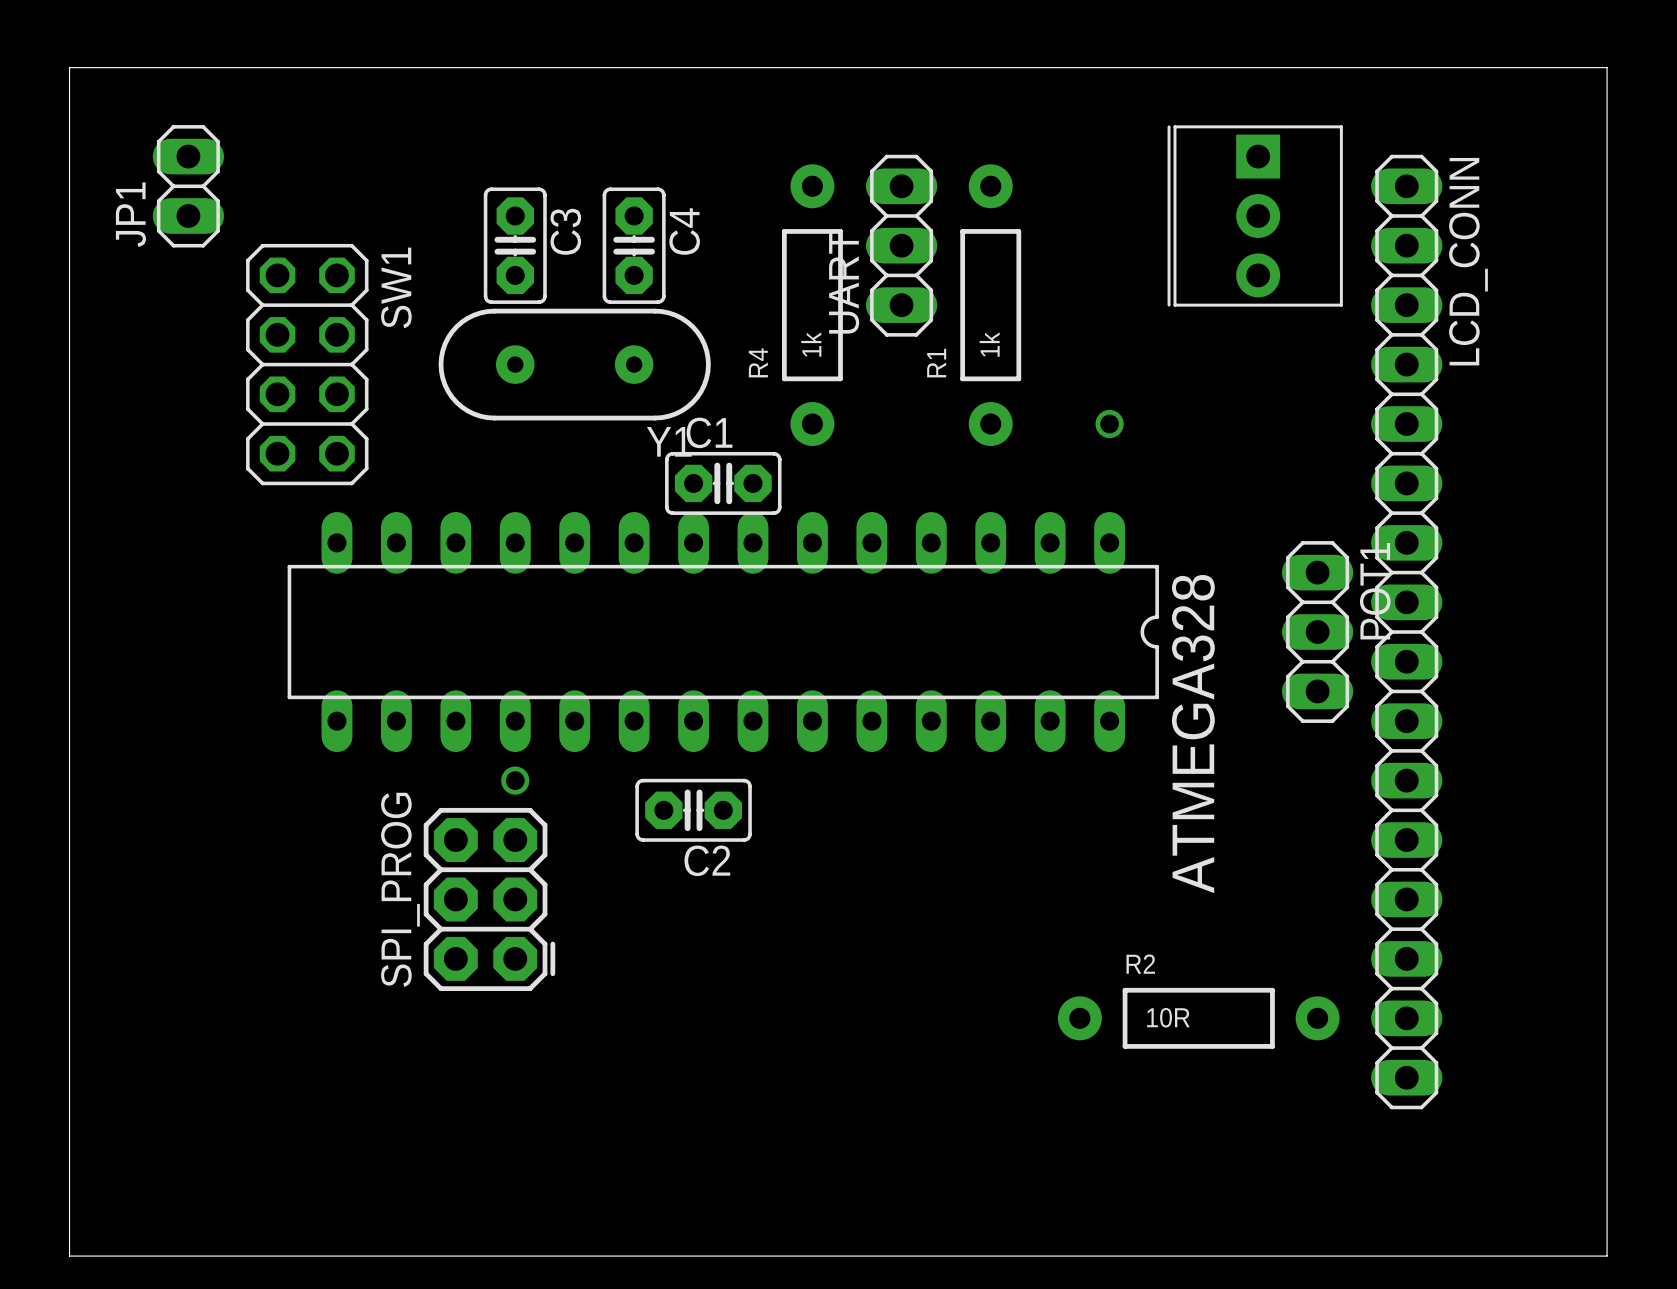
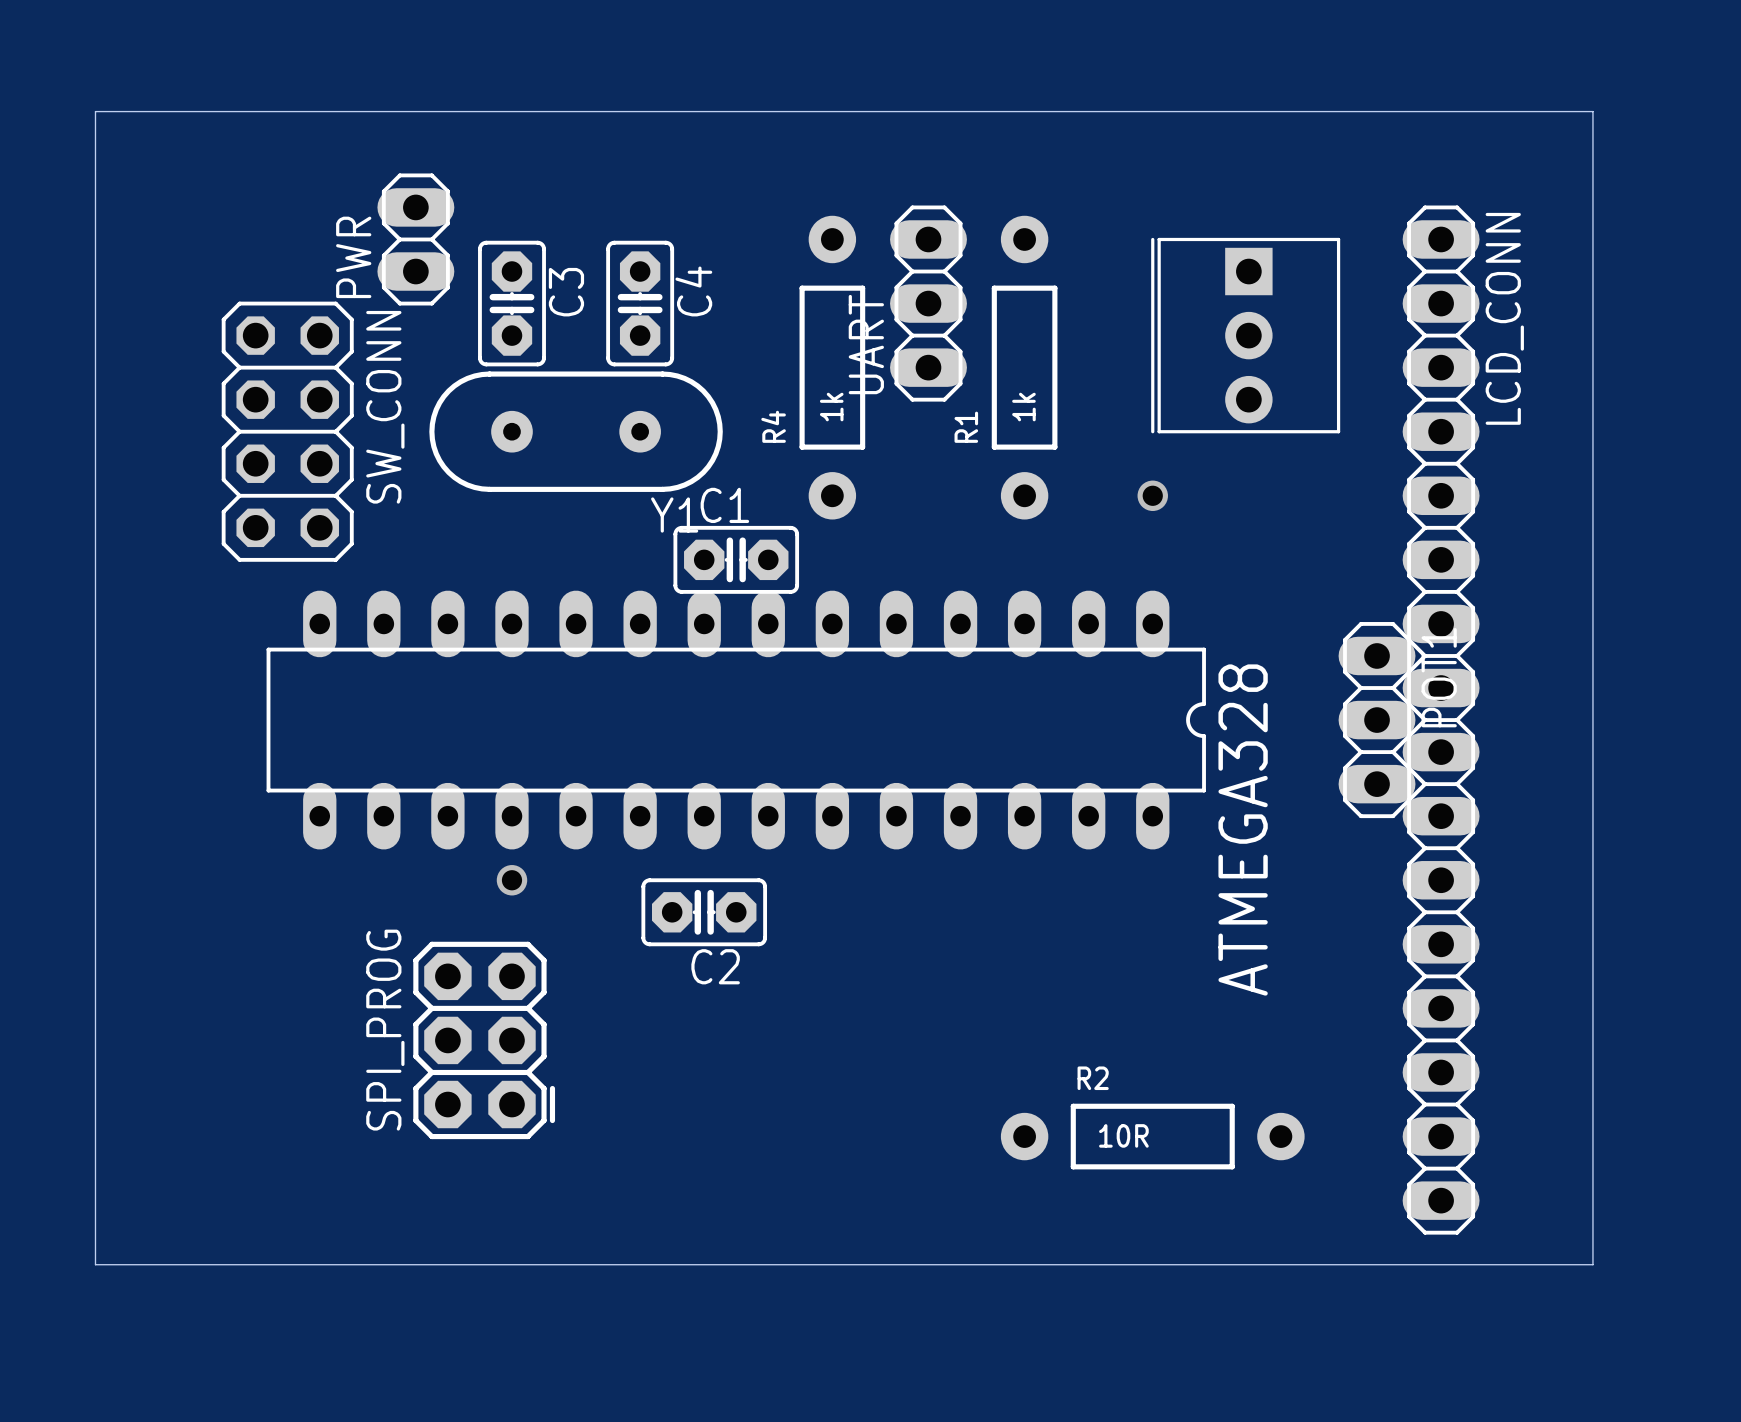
board edge: (128, 67) (69, 67) (69, 1256) (1607, 1256) (1607, 67) (1517, 67) -> (95, 111) (95, 1264) (1592, 1264) (1592, 111)
JP1: (188, 186) -> none
PWR: none -> (415, 239)
part position: (1255, 215) -> (1245, 335)
SW1 name: SW1 (396, 287) -> SW_CONN (385, 407)
LCD_CONN position: (1406, 632) -> (1441, 720)
SPI_PROG position: (489, 899) -> (484, 1040)
R2 position: (1198, 1018) -> (1152, 1136)

